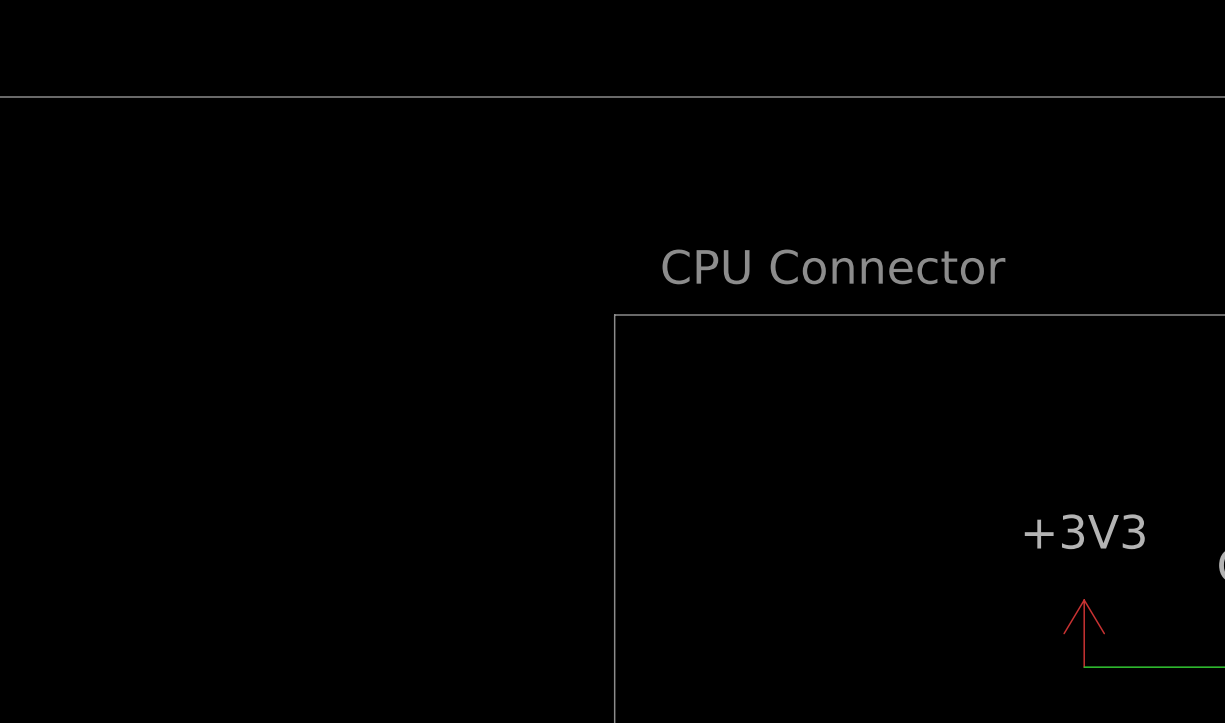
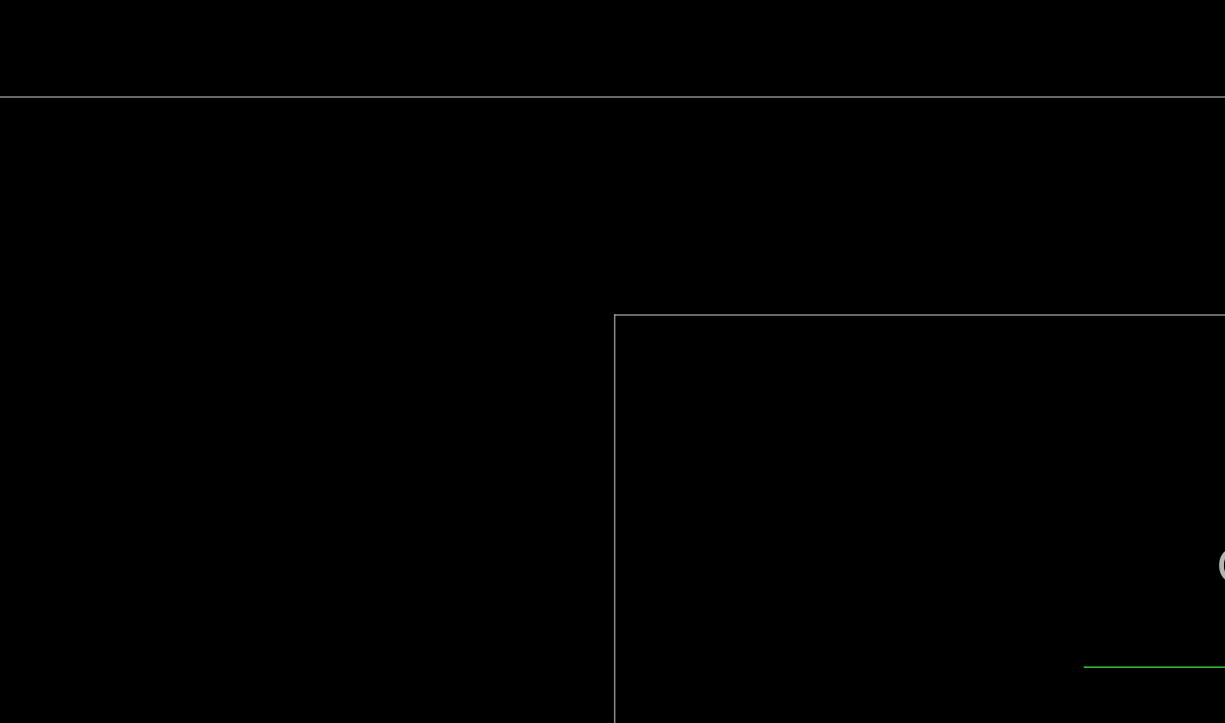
text: CPU Connector (833, 266) -> none
power symbol: +3V3 (1084, 633) -> none

